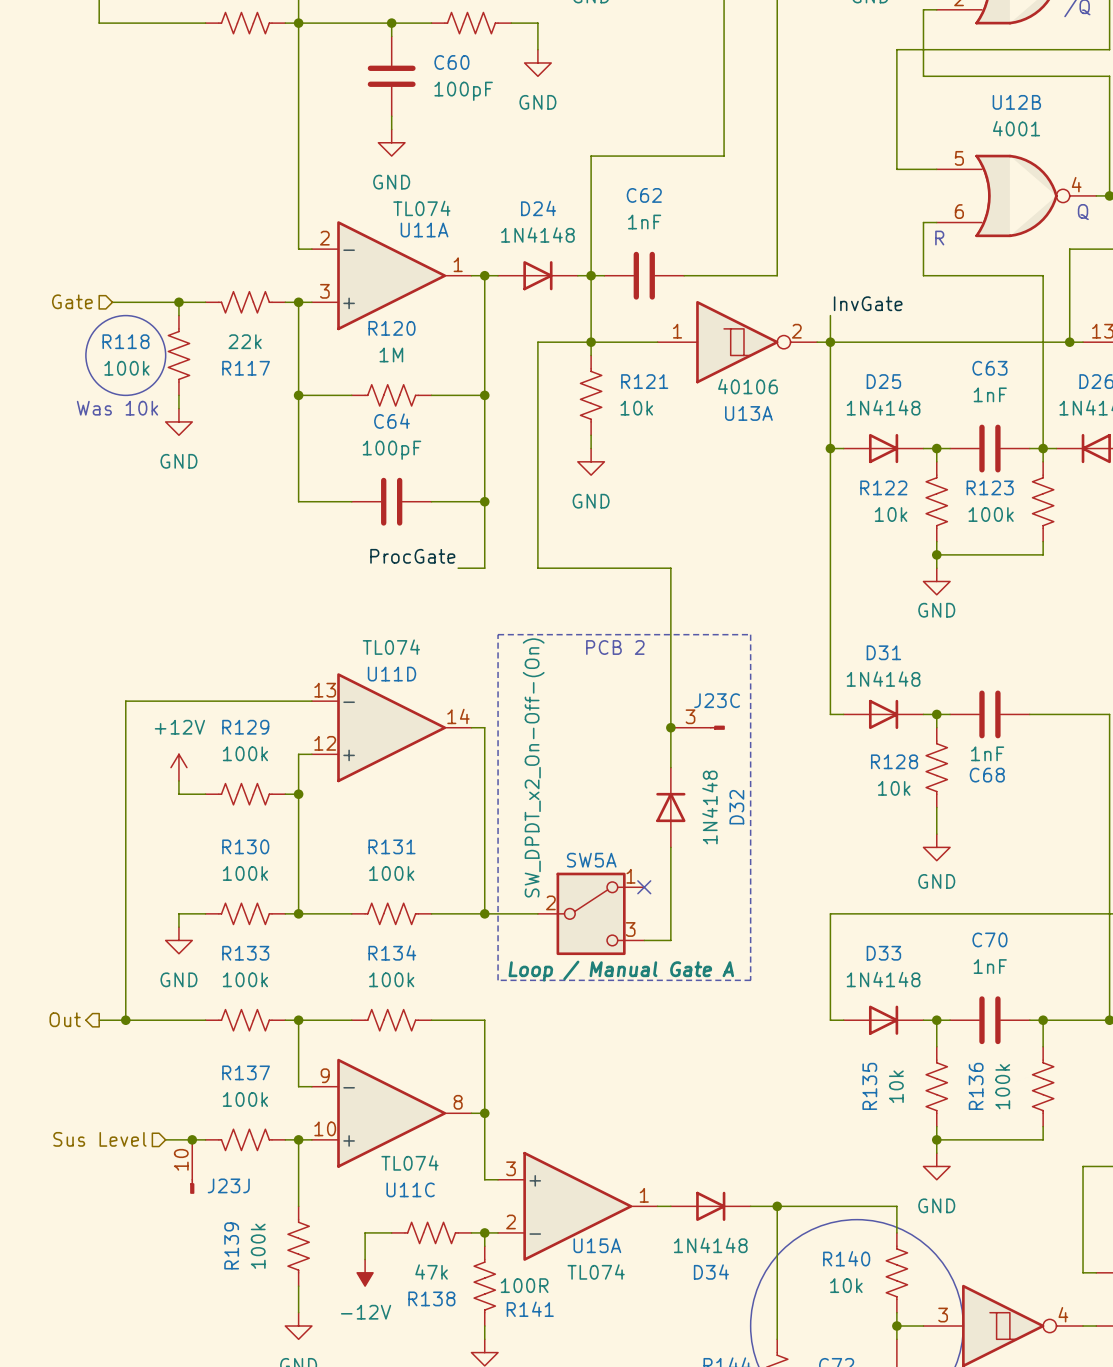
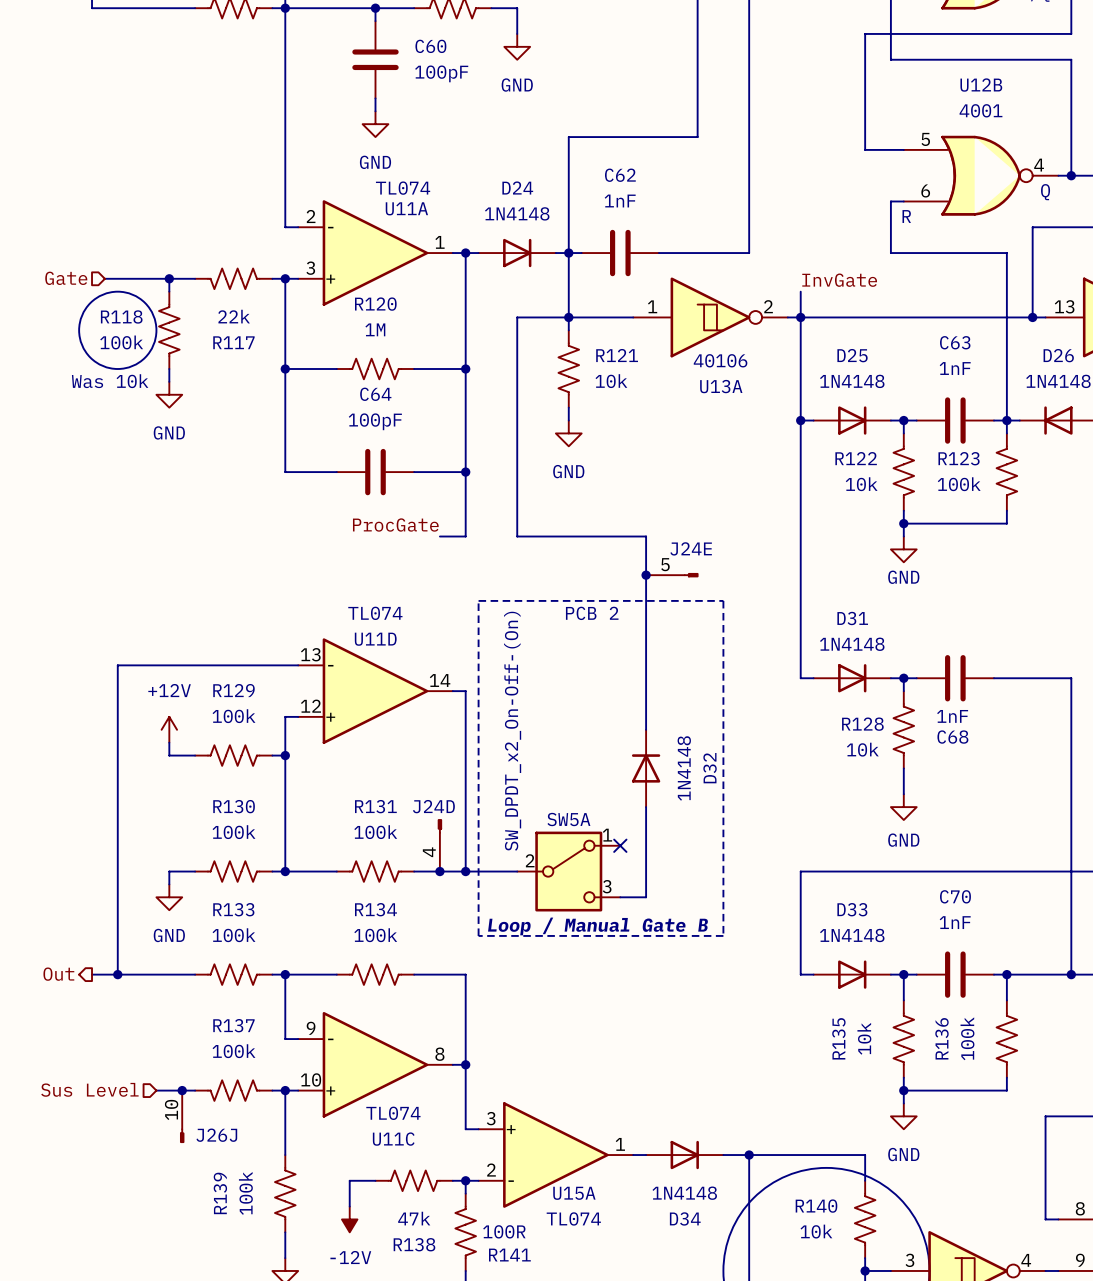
junction: none -> (646, 575)
J24E: none -> (672, 575)
junction: (670, 727) -> none
J23C: (697, 727) -> none
J24D: none -> (439, 845)
junction: none -> (439, 871)
SW5A text: Loop / Manual Gate A (621, 971) -> Loop / Manual Gate B (598, 926)
J23J name: J23J (228, 1185) -> J26J (216, 1135)

